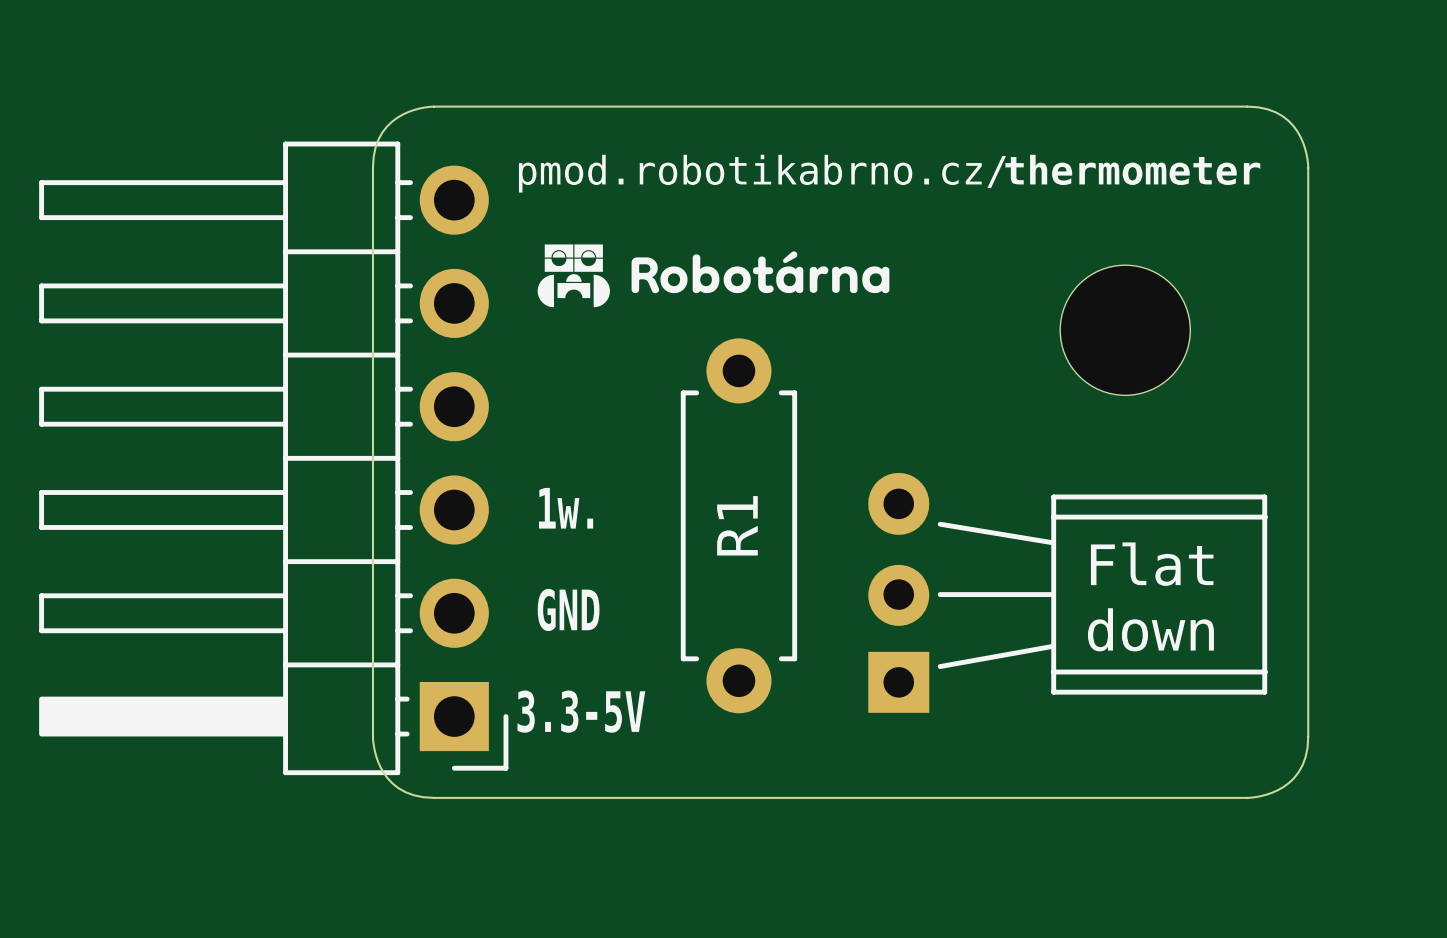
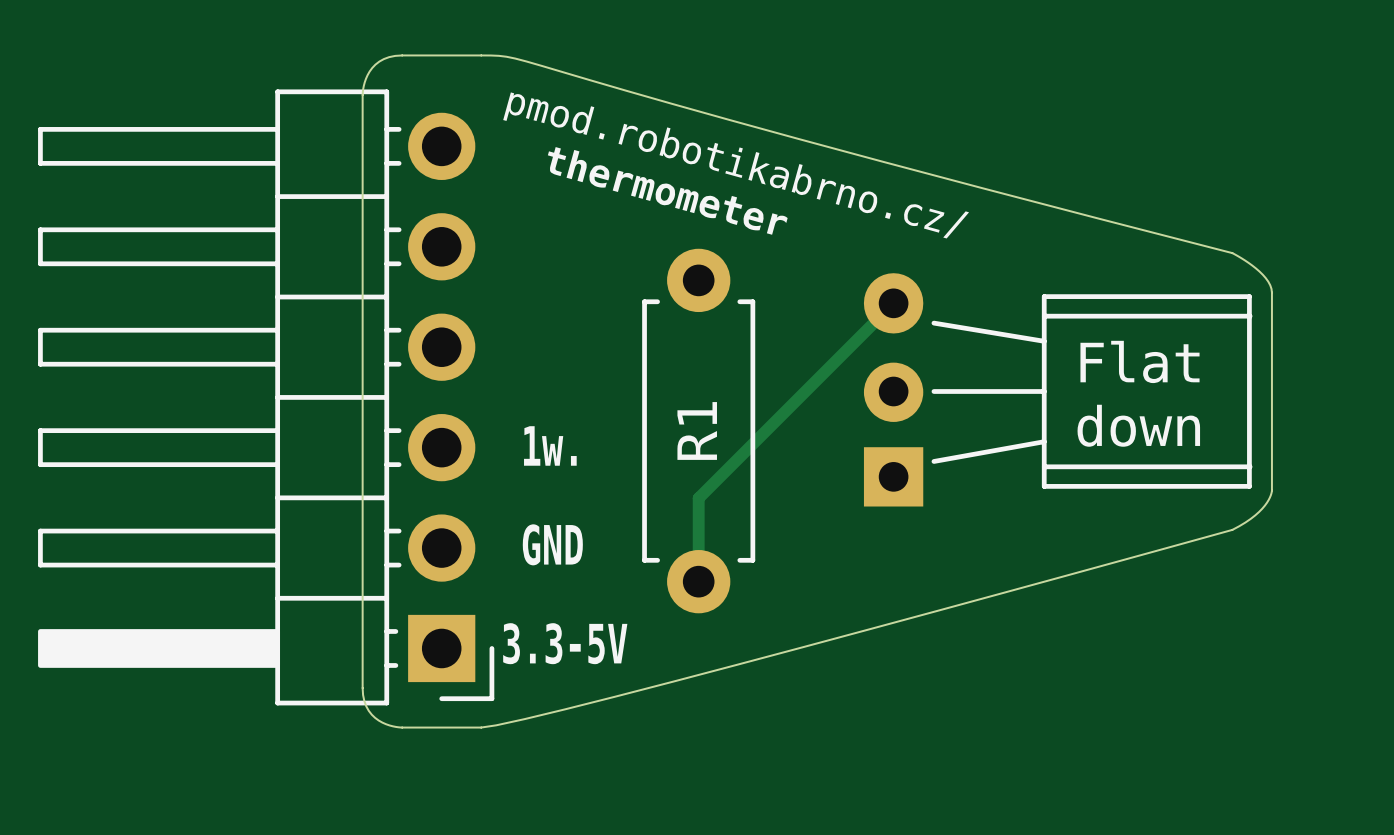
board edge: (433, 106) (1247, 106) (1267, 109) (1282, 116) (1293, 125) (1300, 137) (1306, 153) (1308, 166) (1308, 736) (1305, 757) (1298, 772) (1288, 783) (1277, 790) (1261, 796) (1247, 797) (433, 797) (413, 795) (398, 788) (387, 778) (380, 767) (374, 751) (373, 737) (372, 167) (375, 147) (387, 126) (397, 117) (409, 111) (433, 106) -> (402, 55) (389, 57) (375, 64) (365, 78) (362, 94) (362, 688) (364, 701) (368, 710) (382, 722) (401, 727) (481, 727) (565, 709) (803, 647) (1232, 529) (1255, 515) (1268, 500) (1271, 490) (1271, 288) (1259, 271) (1232, 253) (798, 138) (515, 58) (490, 55) (402, 55)
text rotation: 0° (1132, 169) -> 15.5° clockwise (667, 190)
text position: thermometer (1132, 169) -> thermometer (667, 190)
text rotation: 0° (762, 173) -> 15.5° clockwise (736, 165)
drawing: [537, 244, 890, 308] -> none
part: (1125, 330) -> none
track: none -> (893, 303) (698, 498) (698, 581)
R1 position: (738, 525) -> (698, 431)
text position: Flat (1152, 564) -> Flat (1140, 361)
part position: (1068, 592) -> (1058, 389)
text position: down (1150, 629) -> down (1138, 425)

